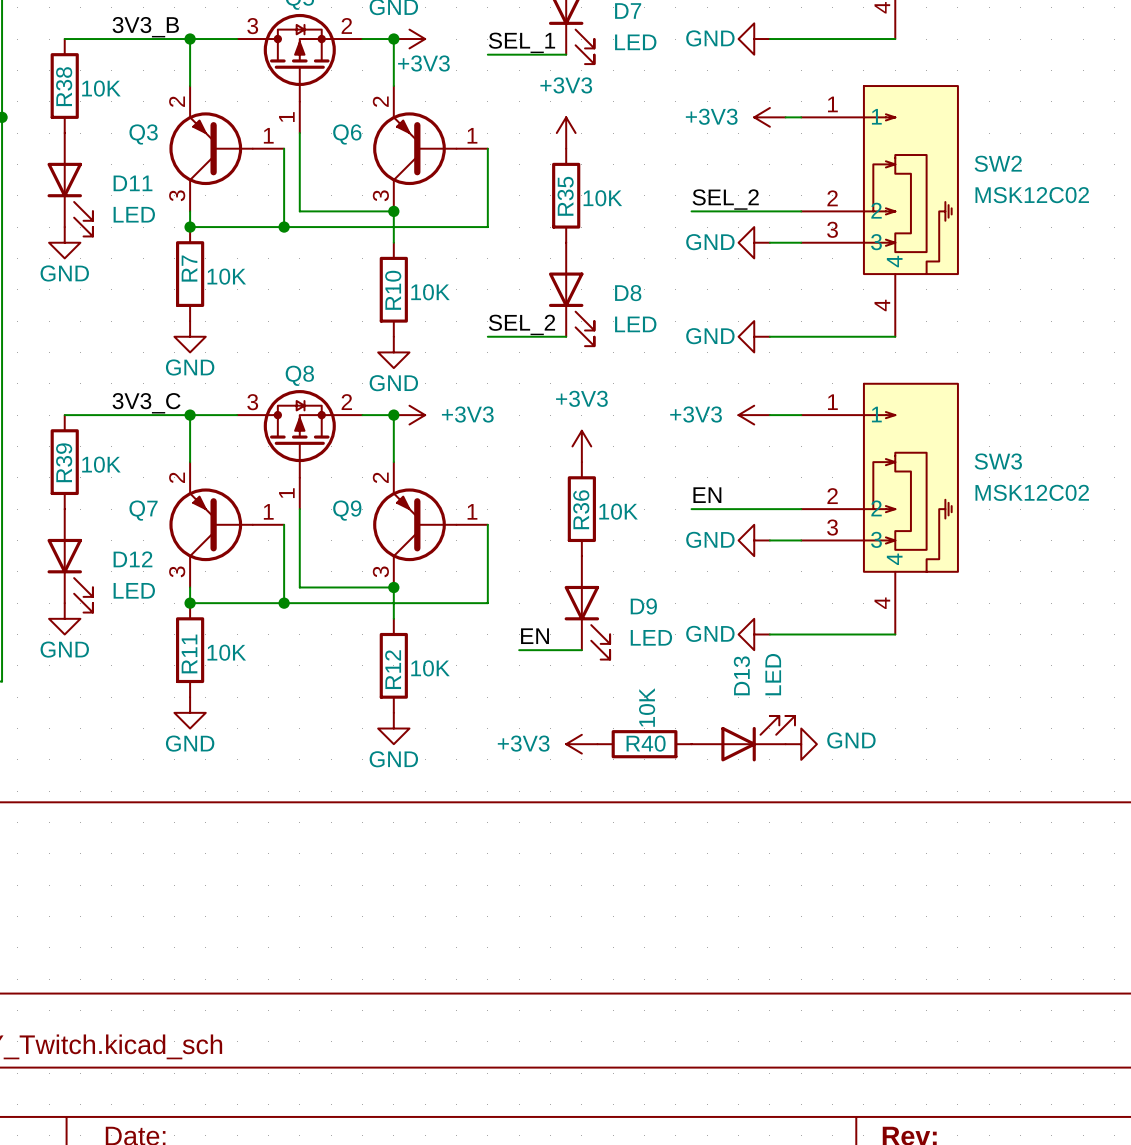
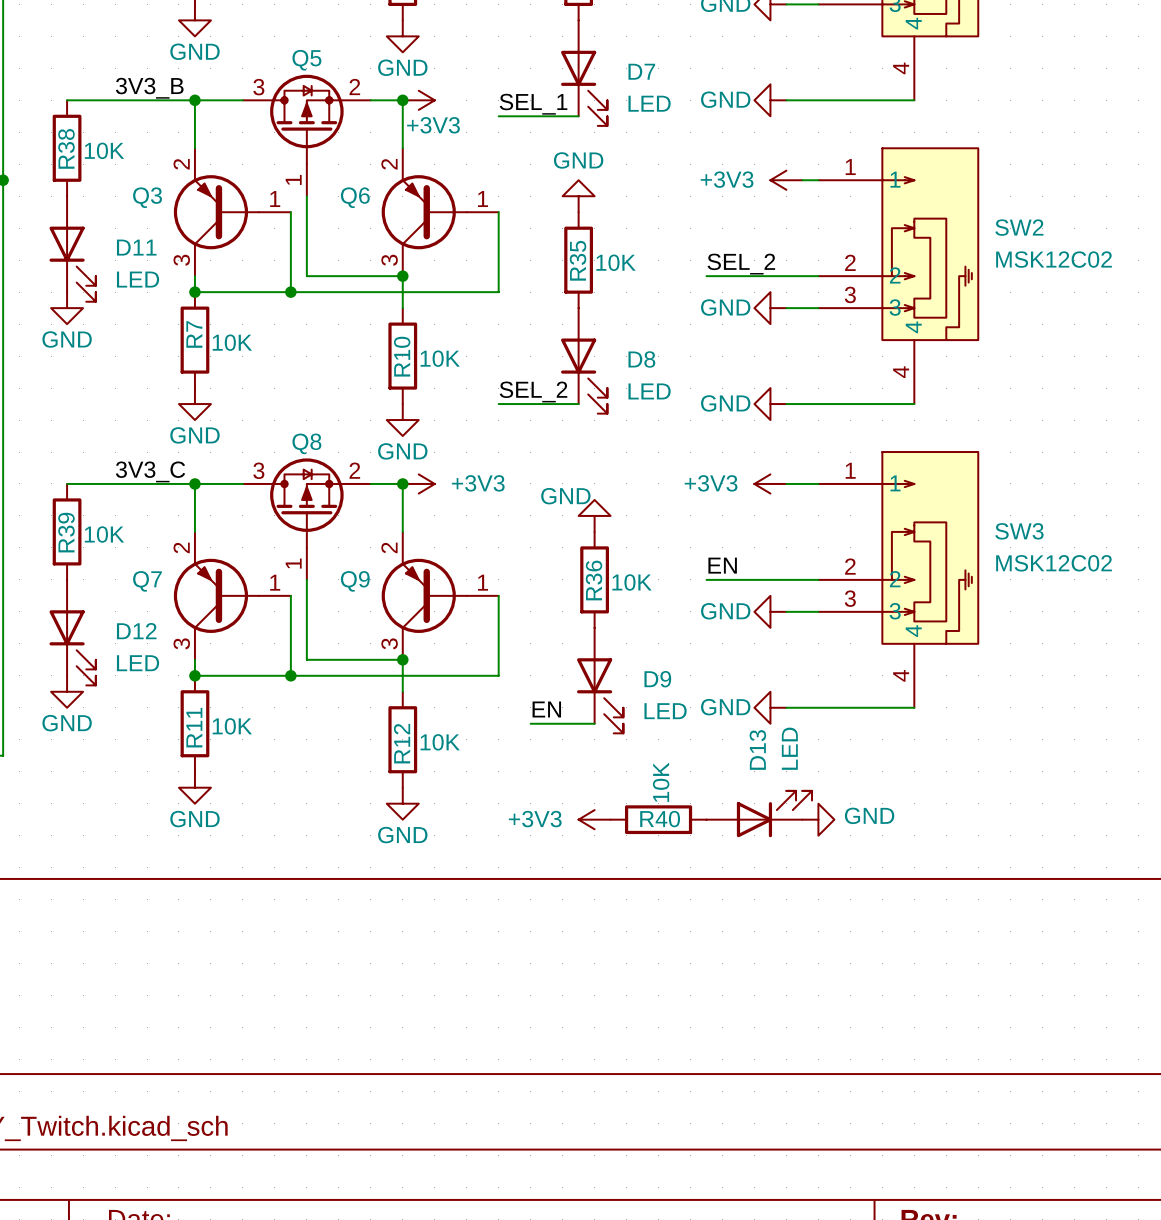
power symbol: +3V3 (566, 133) -> GND (578, 196)
power symbol: +3V3 (581, 446) -> GND (594, 515)

